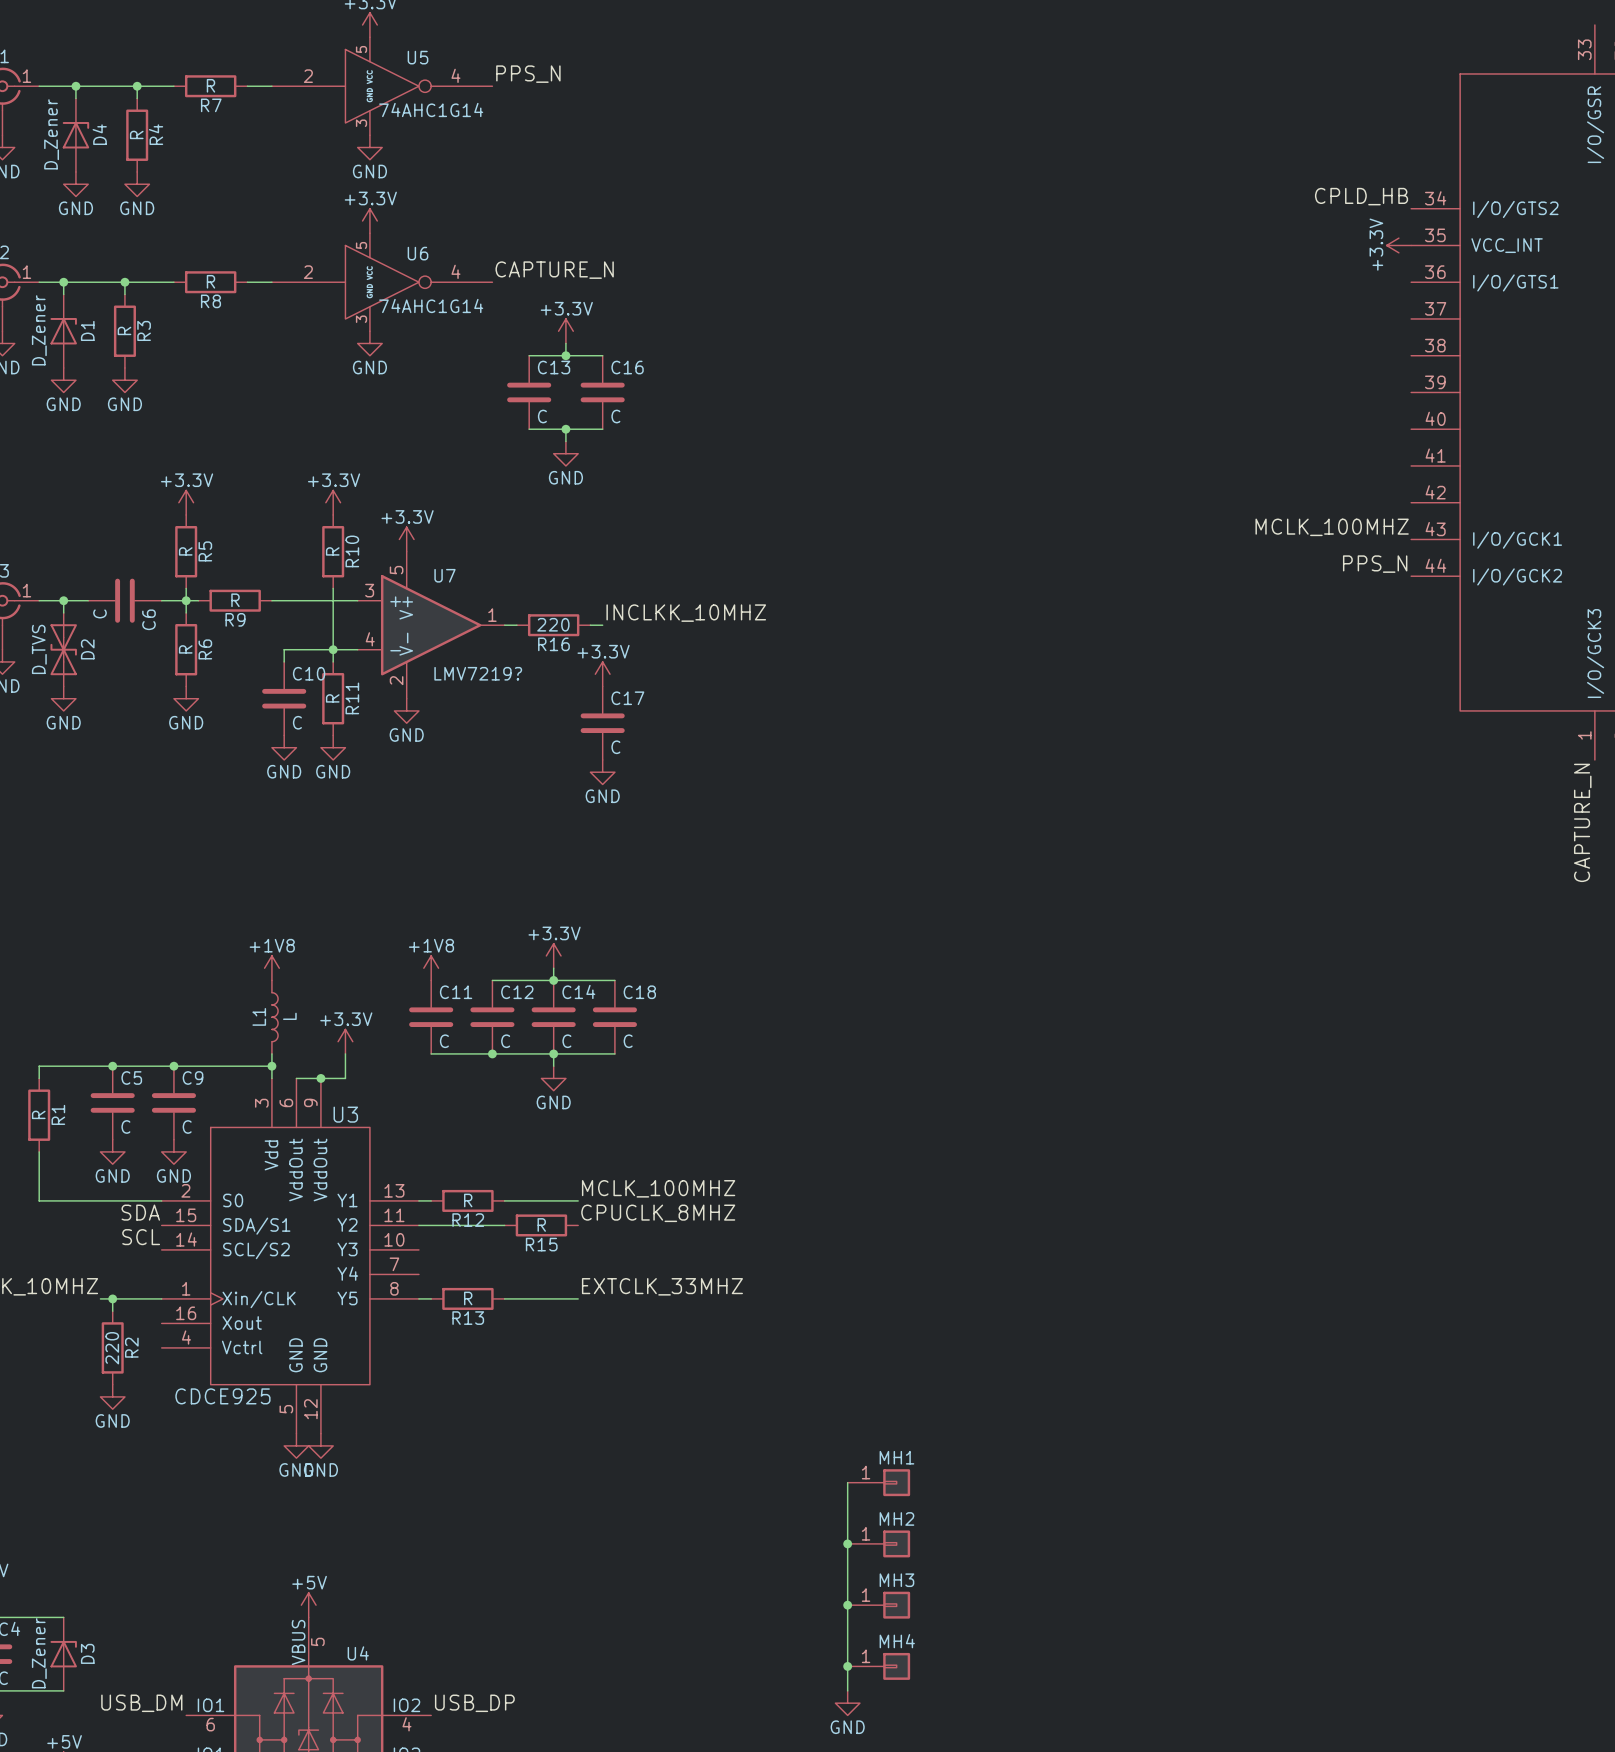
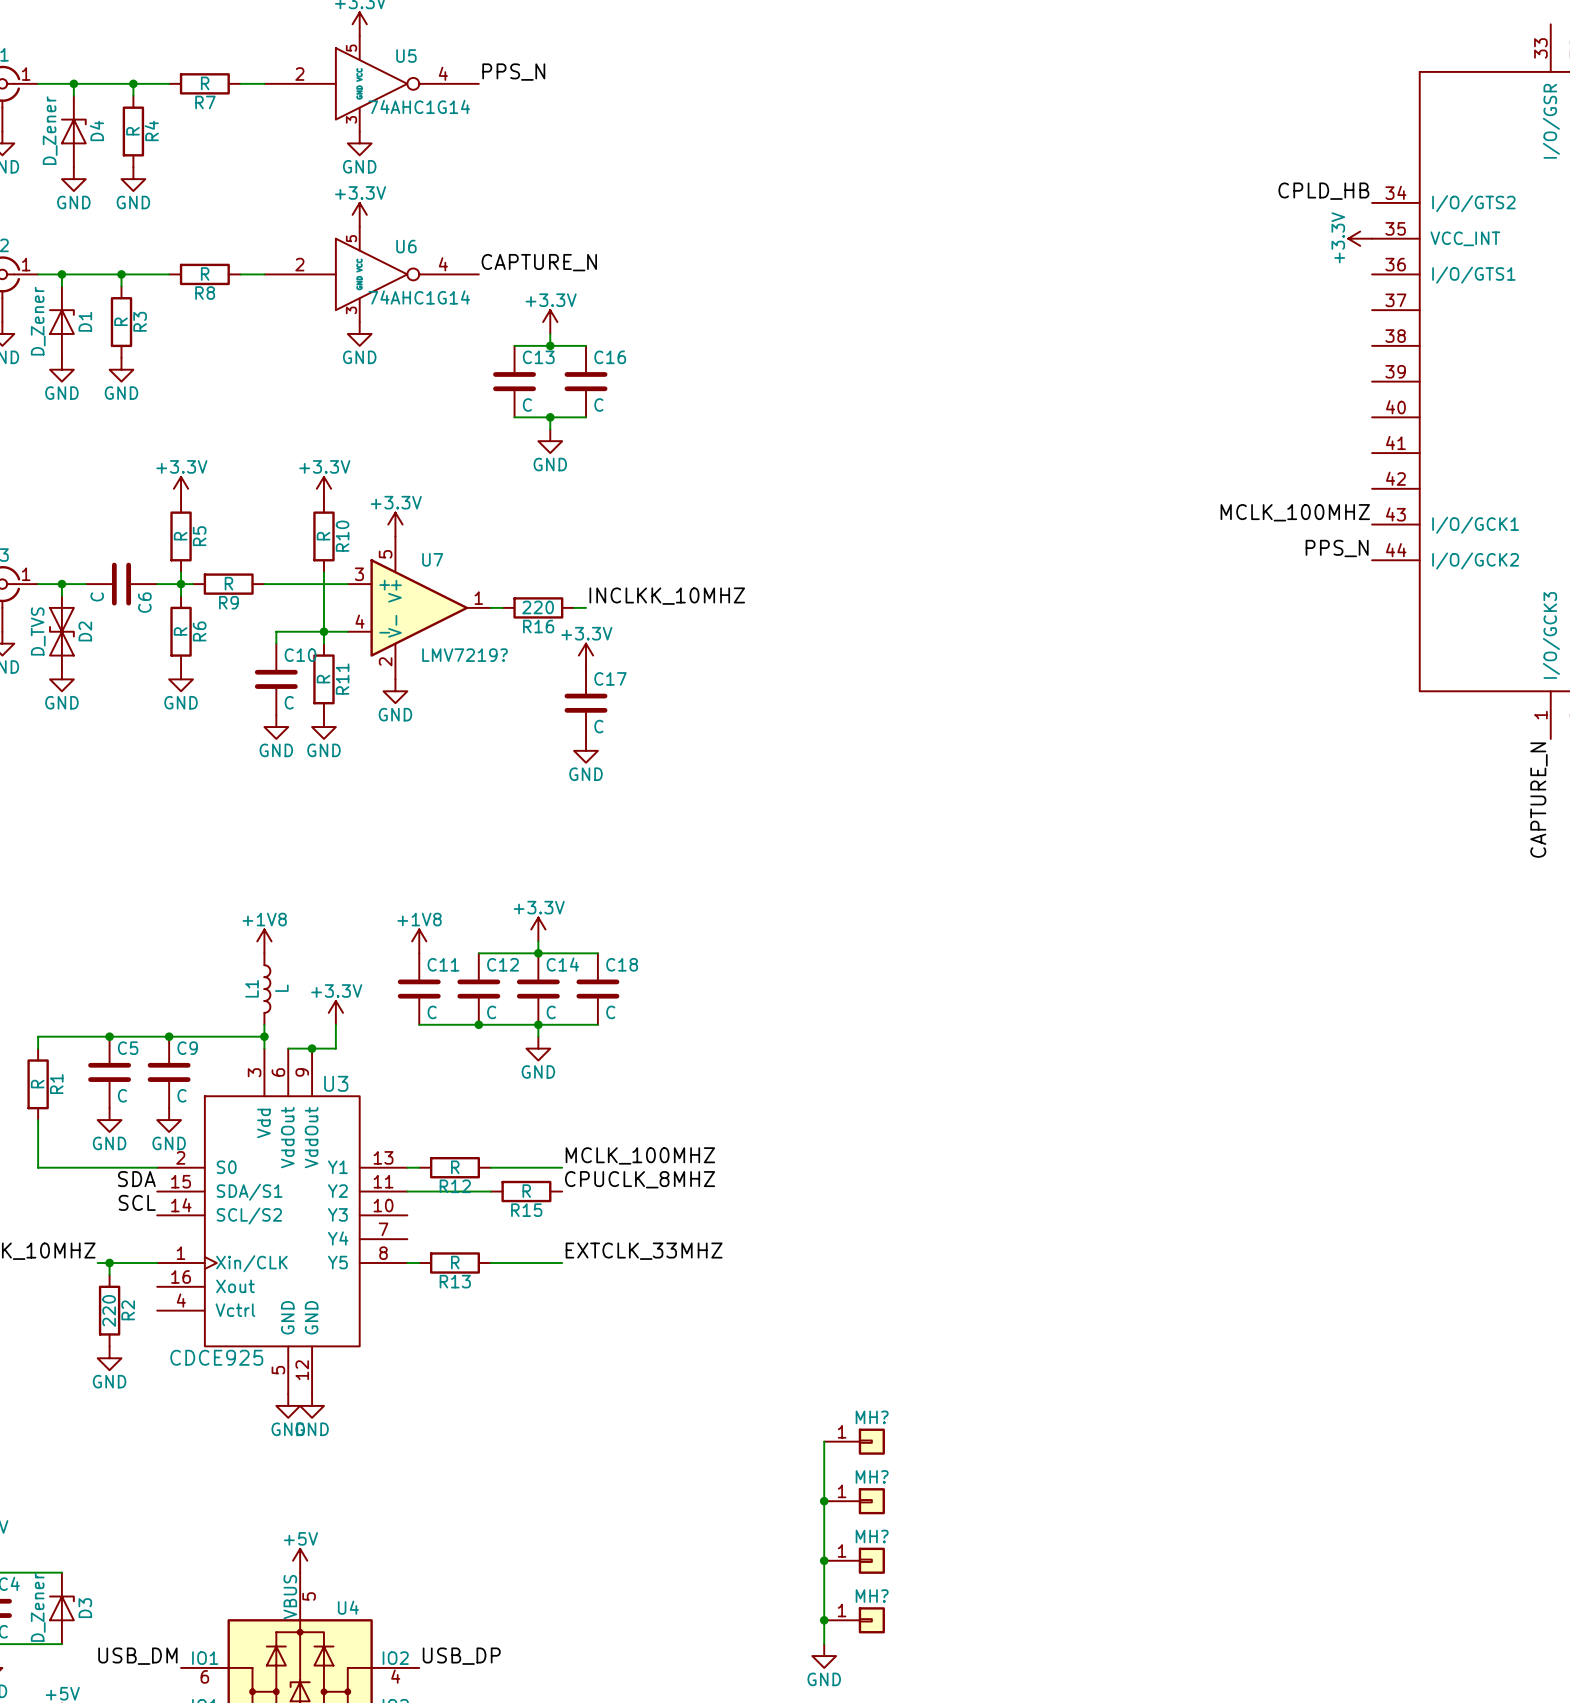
MH1 name: MH1 (896, 1457) -> MH? (872, 1417)
MH2 name: MH2 (896, 1518) -> MH? (872, 1476)
MH3 name: MH3 (896, 1580) -> MH? (872, 1536)
MH4 name: MH4 (897, 1641) -> MH? (872, 1596)

